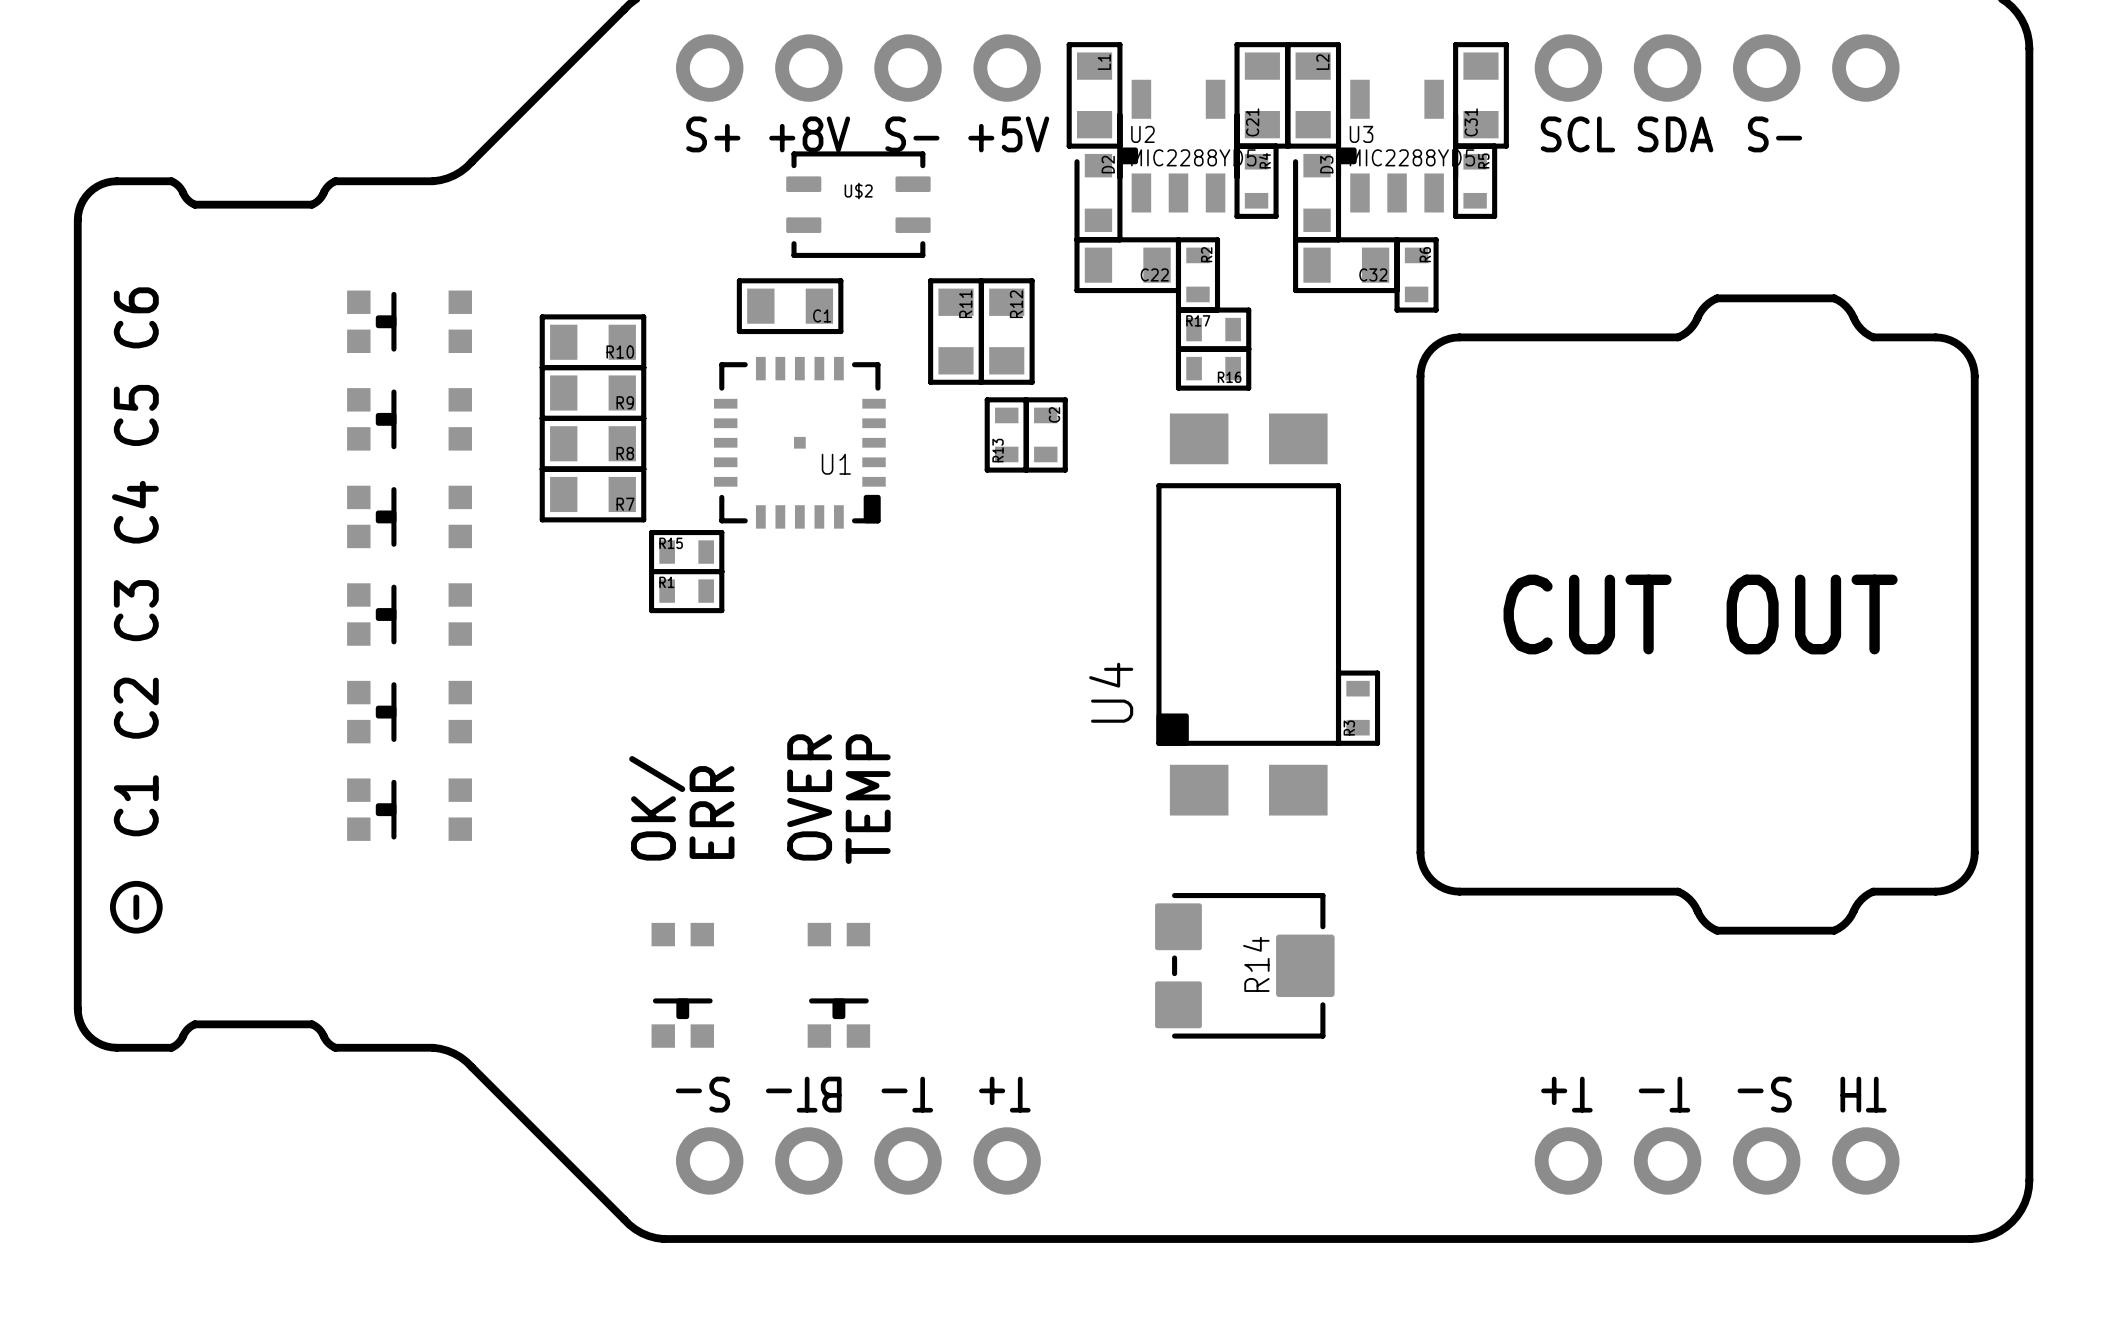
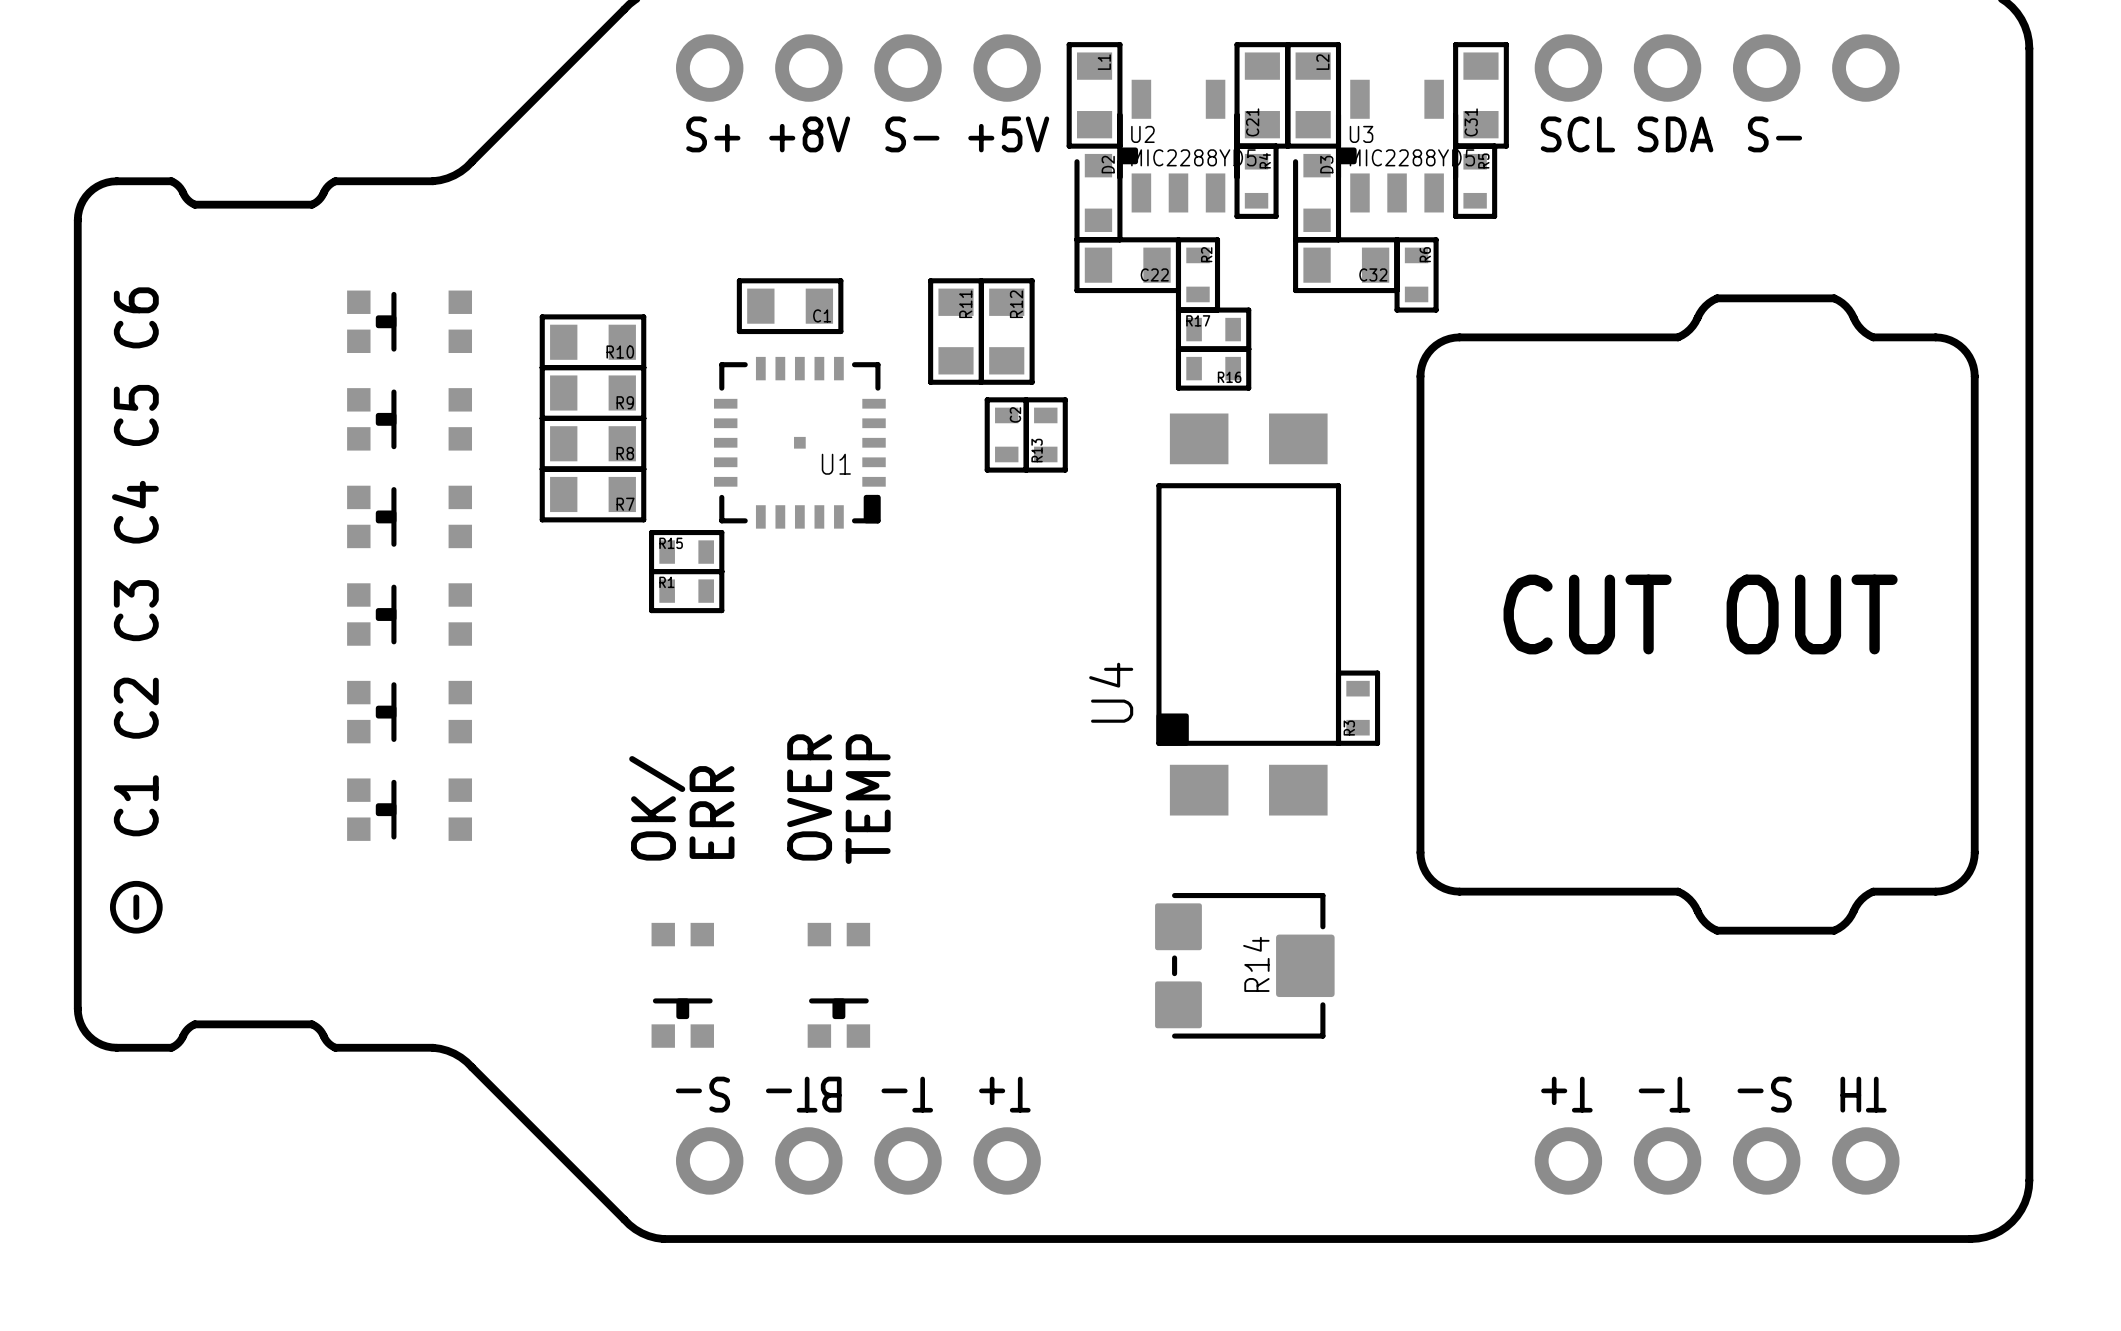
U$2: (858, 204) -> none
C2 name: C2 (1054, 414) -> R13 (1037, 450)
R13 name: R13 (998, 450) -> C2 (1015, 414)

